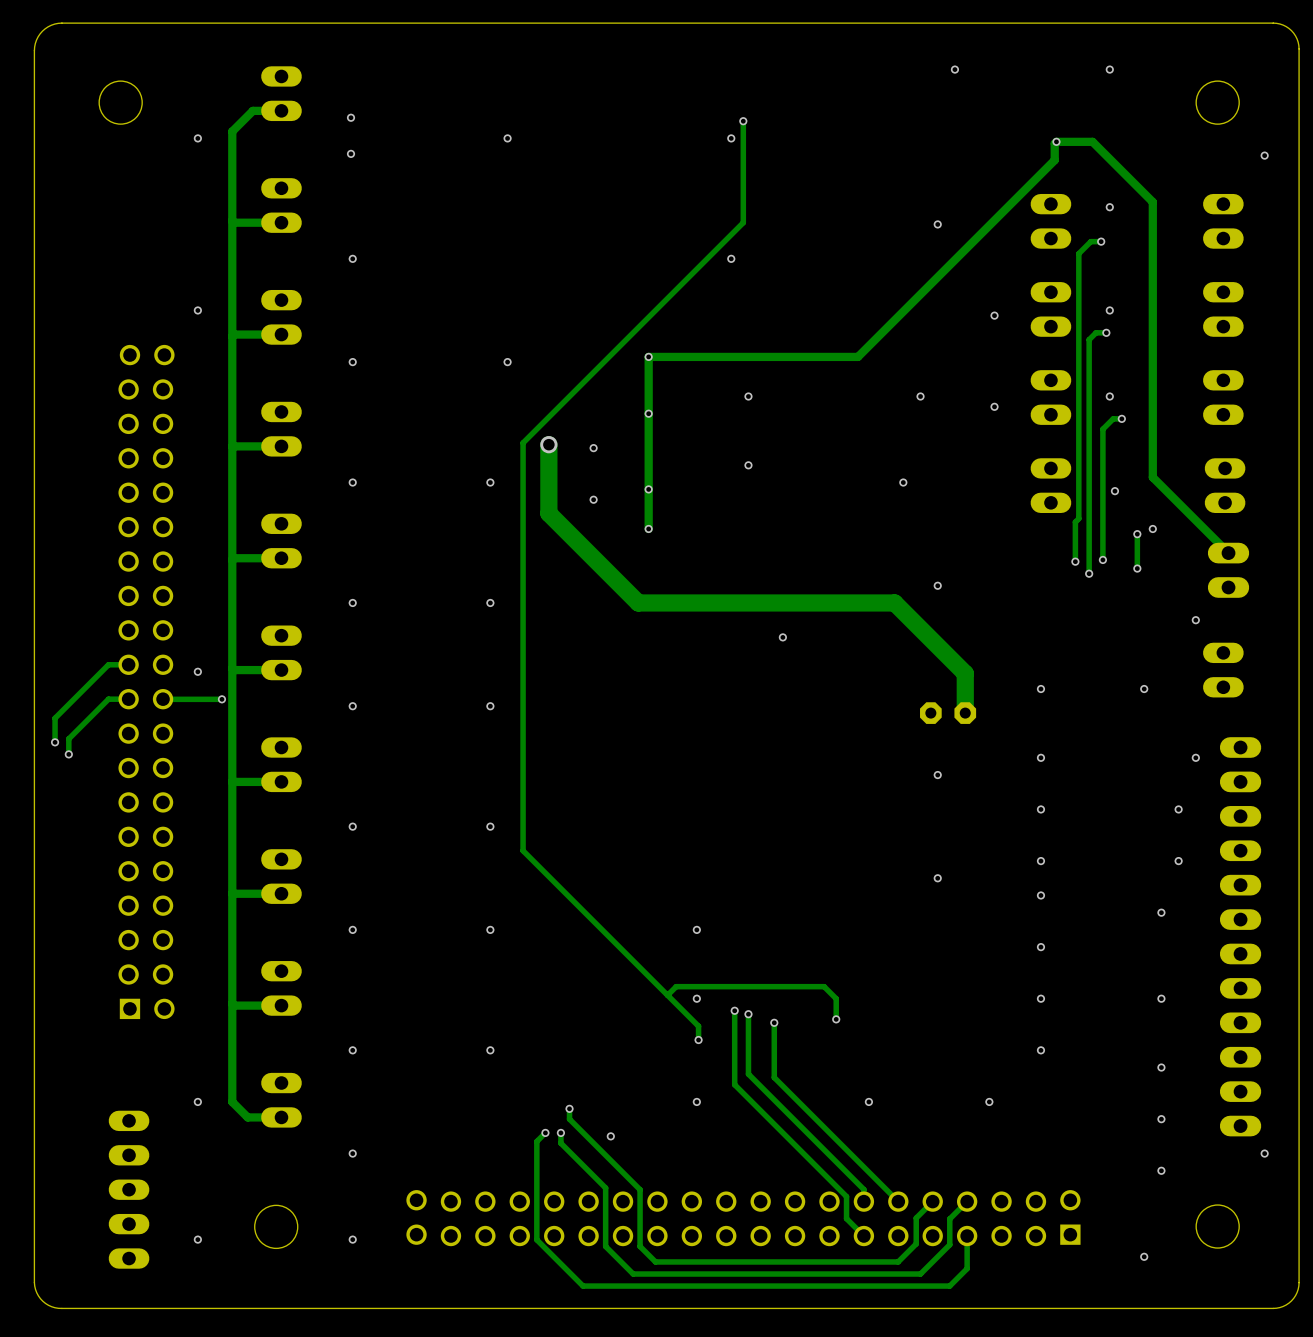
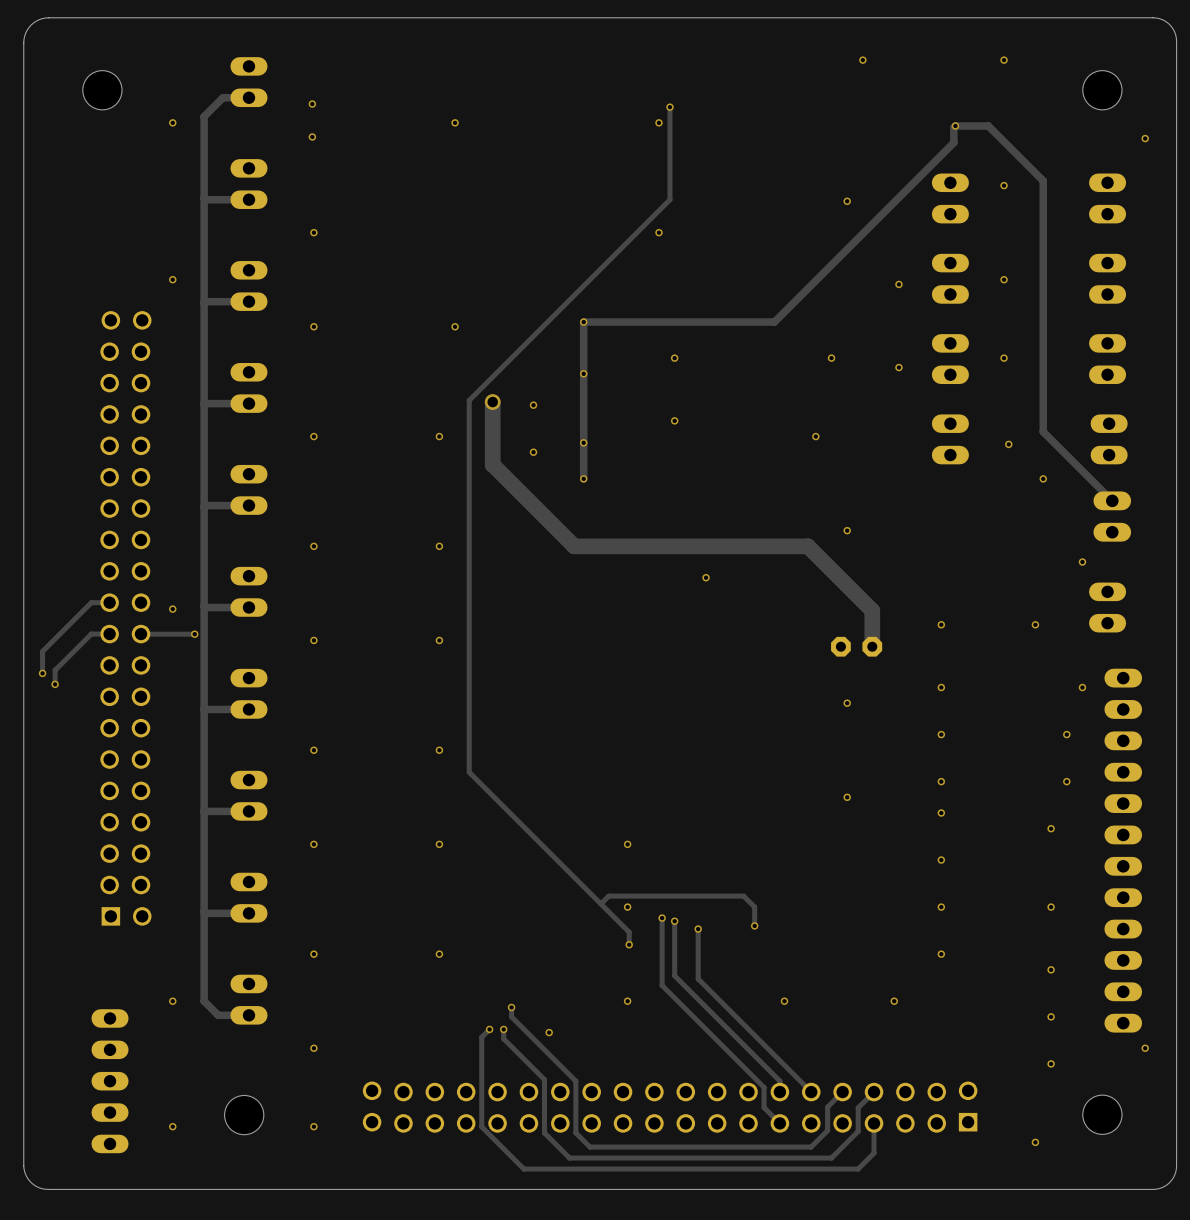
track: (1101, 241) (1090, 241) (1078, 253) (1078, 518) (1075, 522) (1075, 561) -> none
via: (1101, 241) -> none
track: (1106, 332) (1096, 332) (1089, 339) (1089, 573) -> none
via: (1106, 332) -> none
track: (1121, 418) (1113, 418) (1102, 429) (1102, 559) -> none
via: (1121, 418) -> none
track: (1137, 534) (1137, 568) -> none
via: (1137, 534) -> none
via: (1102, 559) -> none
via: (1075, 561) -> none
via: (1137, 568) -> none
via: (1089, 573) -> none

